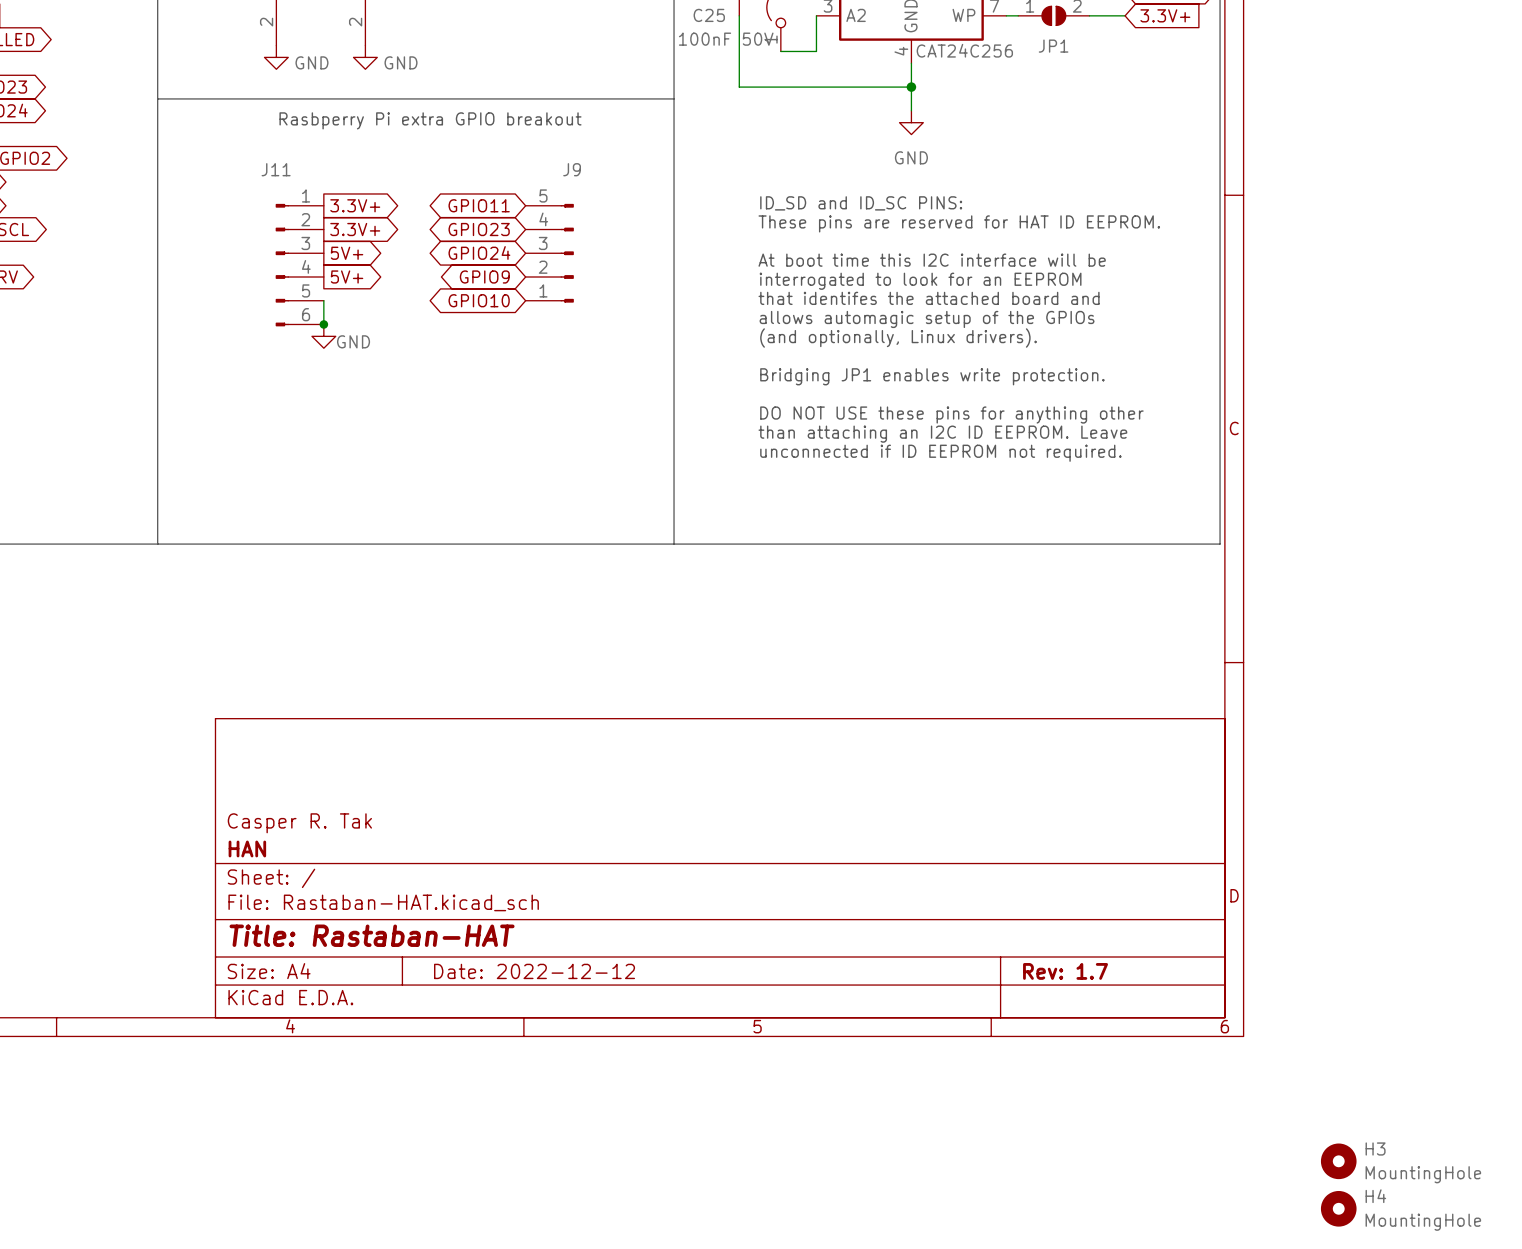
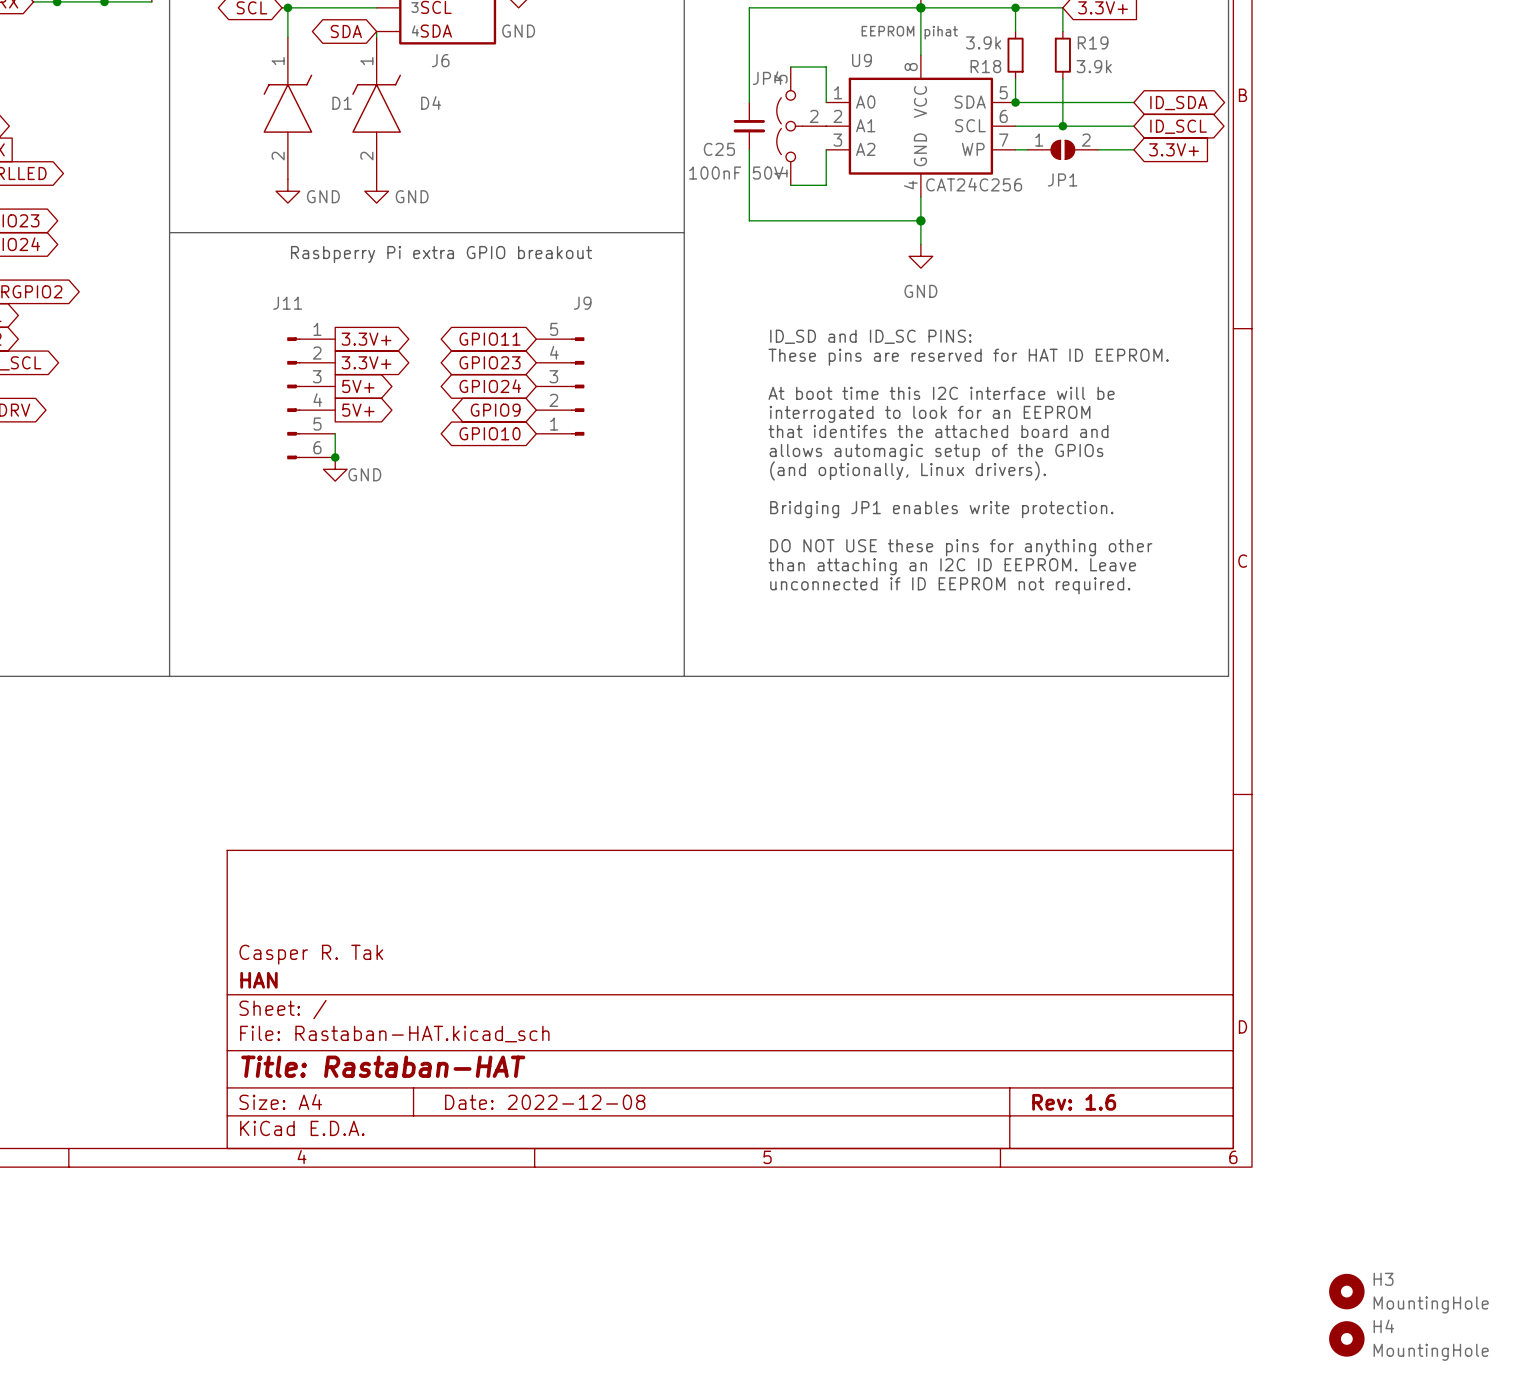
title block: Date: 2022-12-12 (534, 971) -> Date: 2022-12-08 (545, 1102)
title block: Rev: 1.7 (1065, 971) -> Rev: 1.6 (1074, 1102)

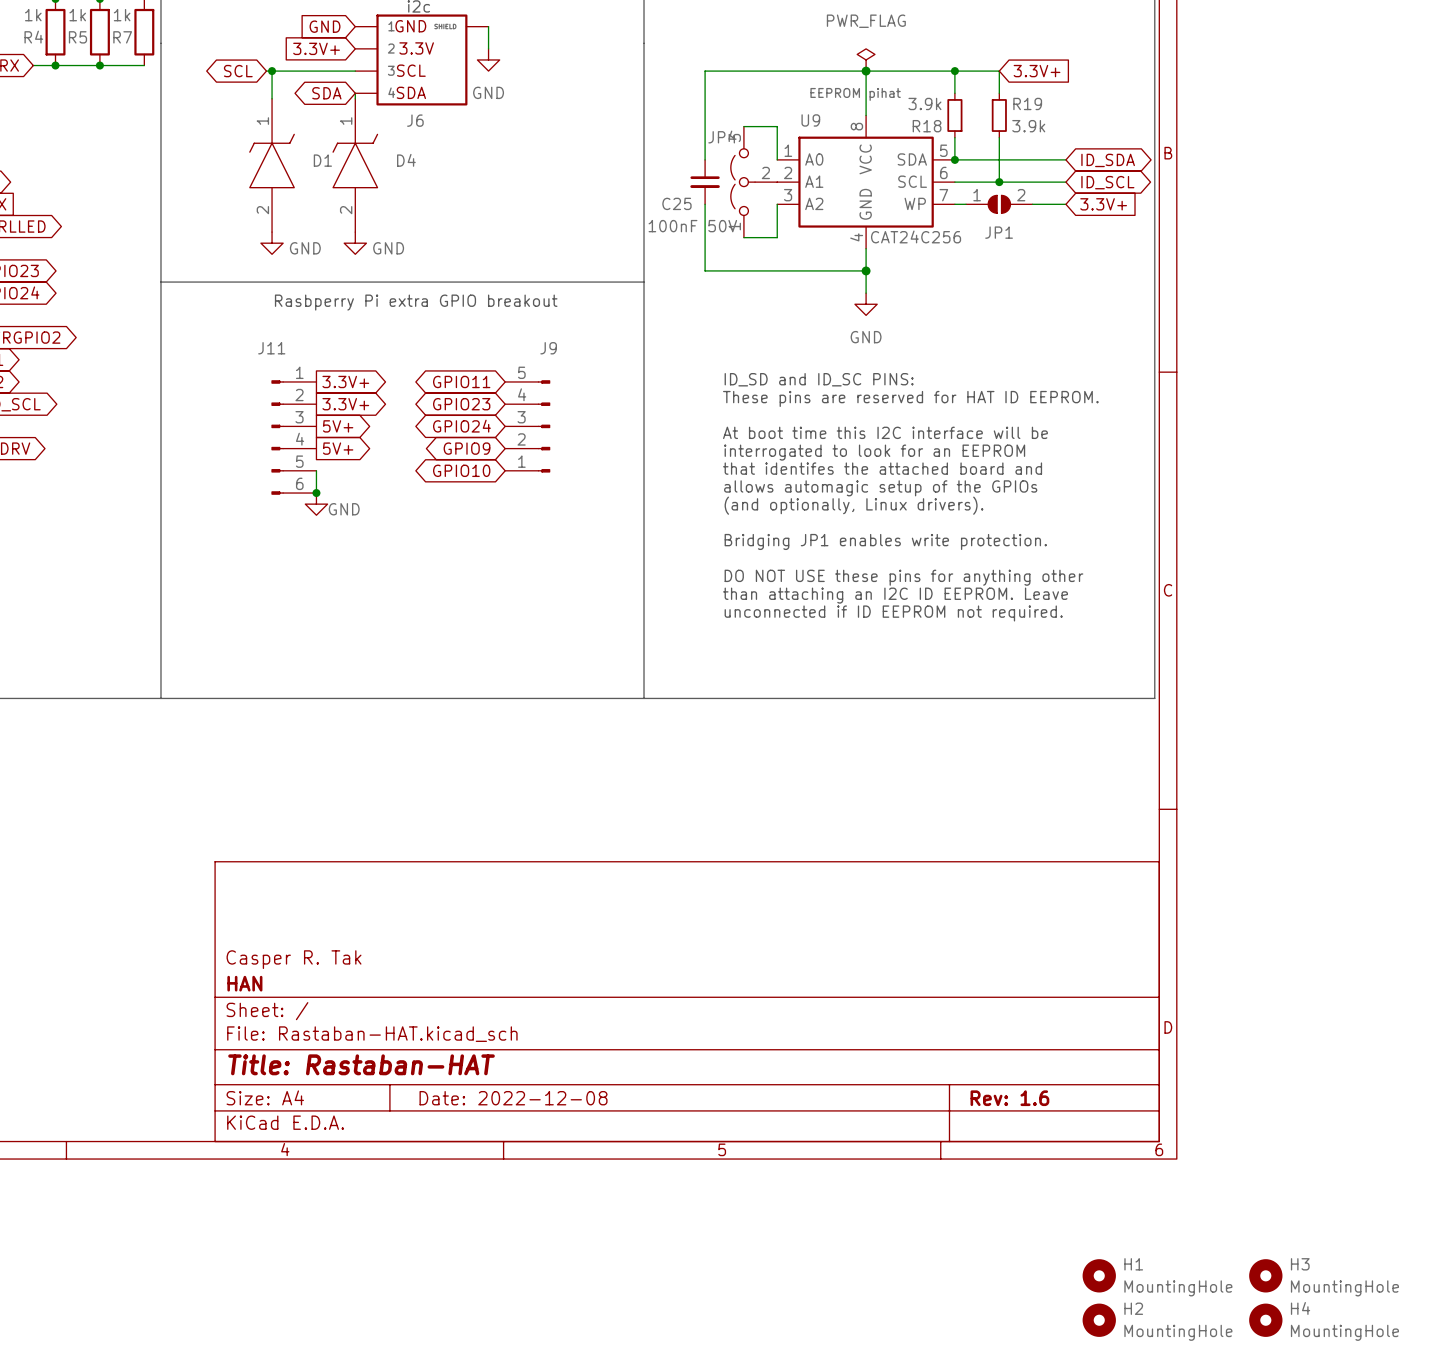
H1: none -> MountingHole (1099, 1275)
H2: none -> MountingHole (1099, 1320)

